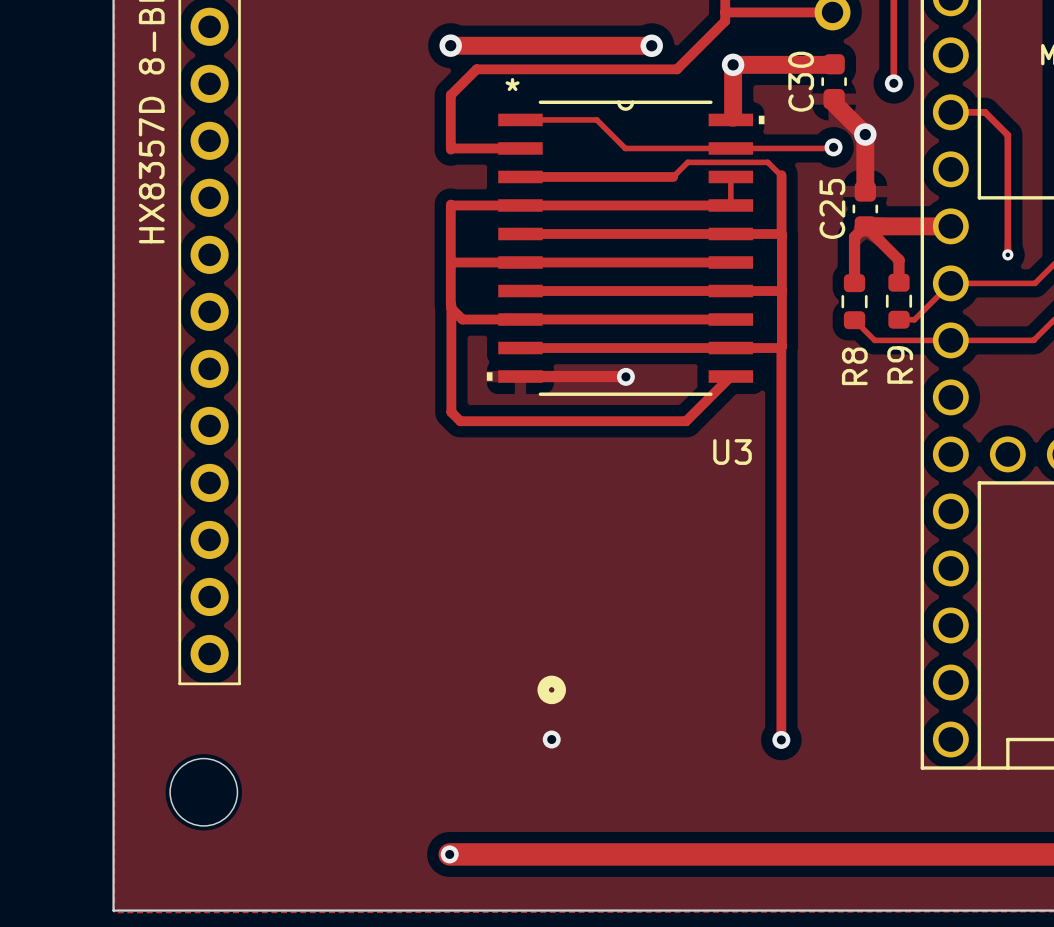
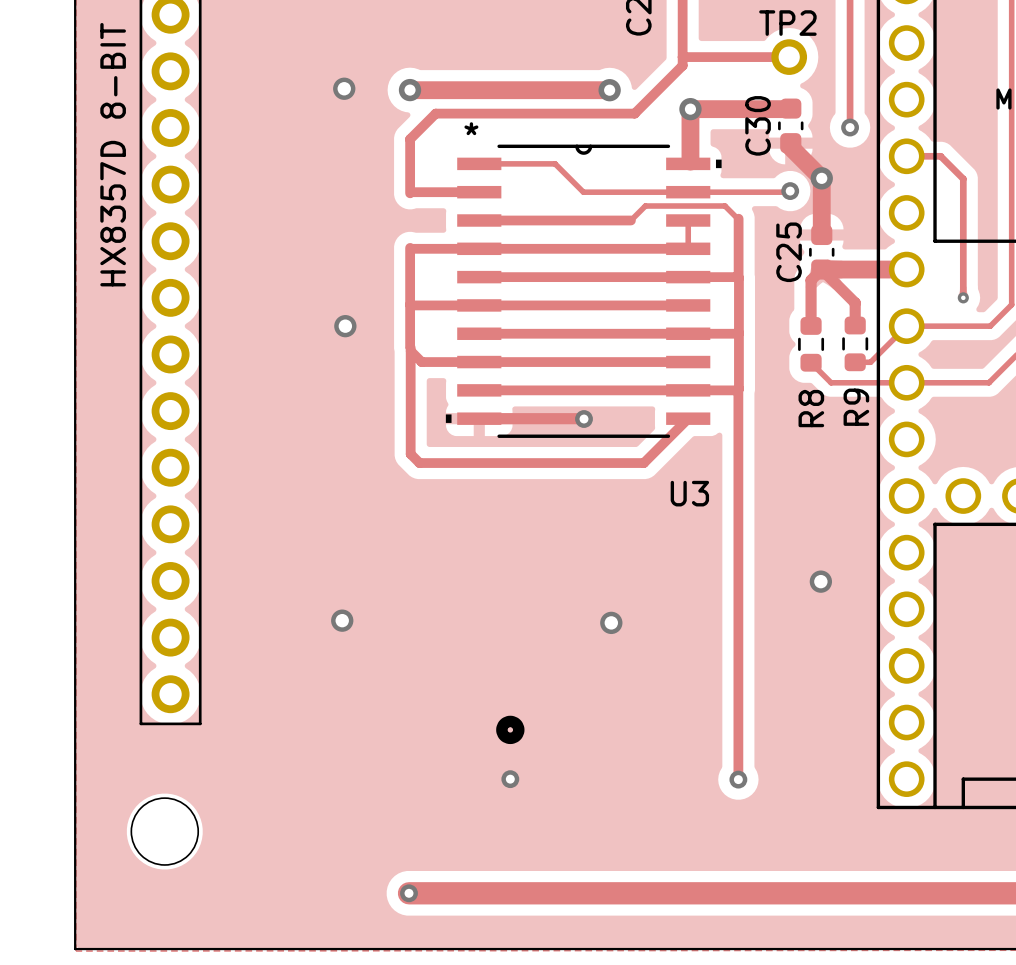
via: none -> (344, 88)
via: none -> (345, 326)
via: none -> (820, 581)
via: none -> (342, 620)
via: none -> (611, 622)

